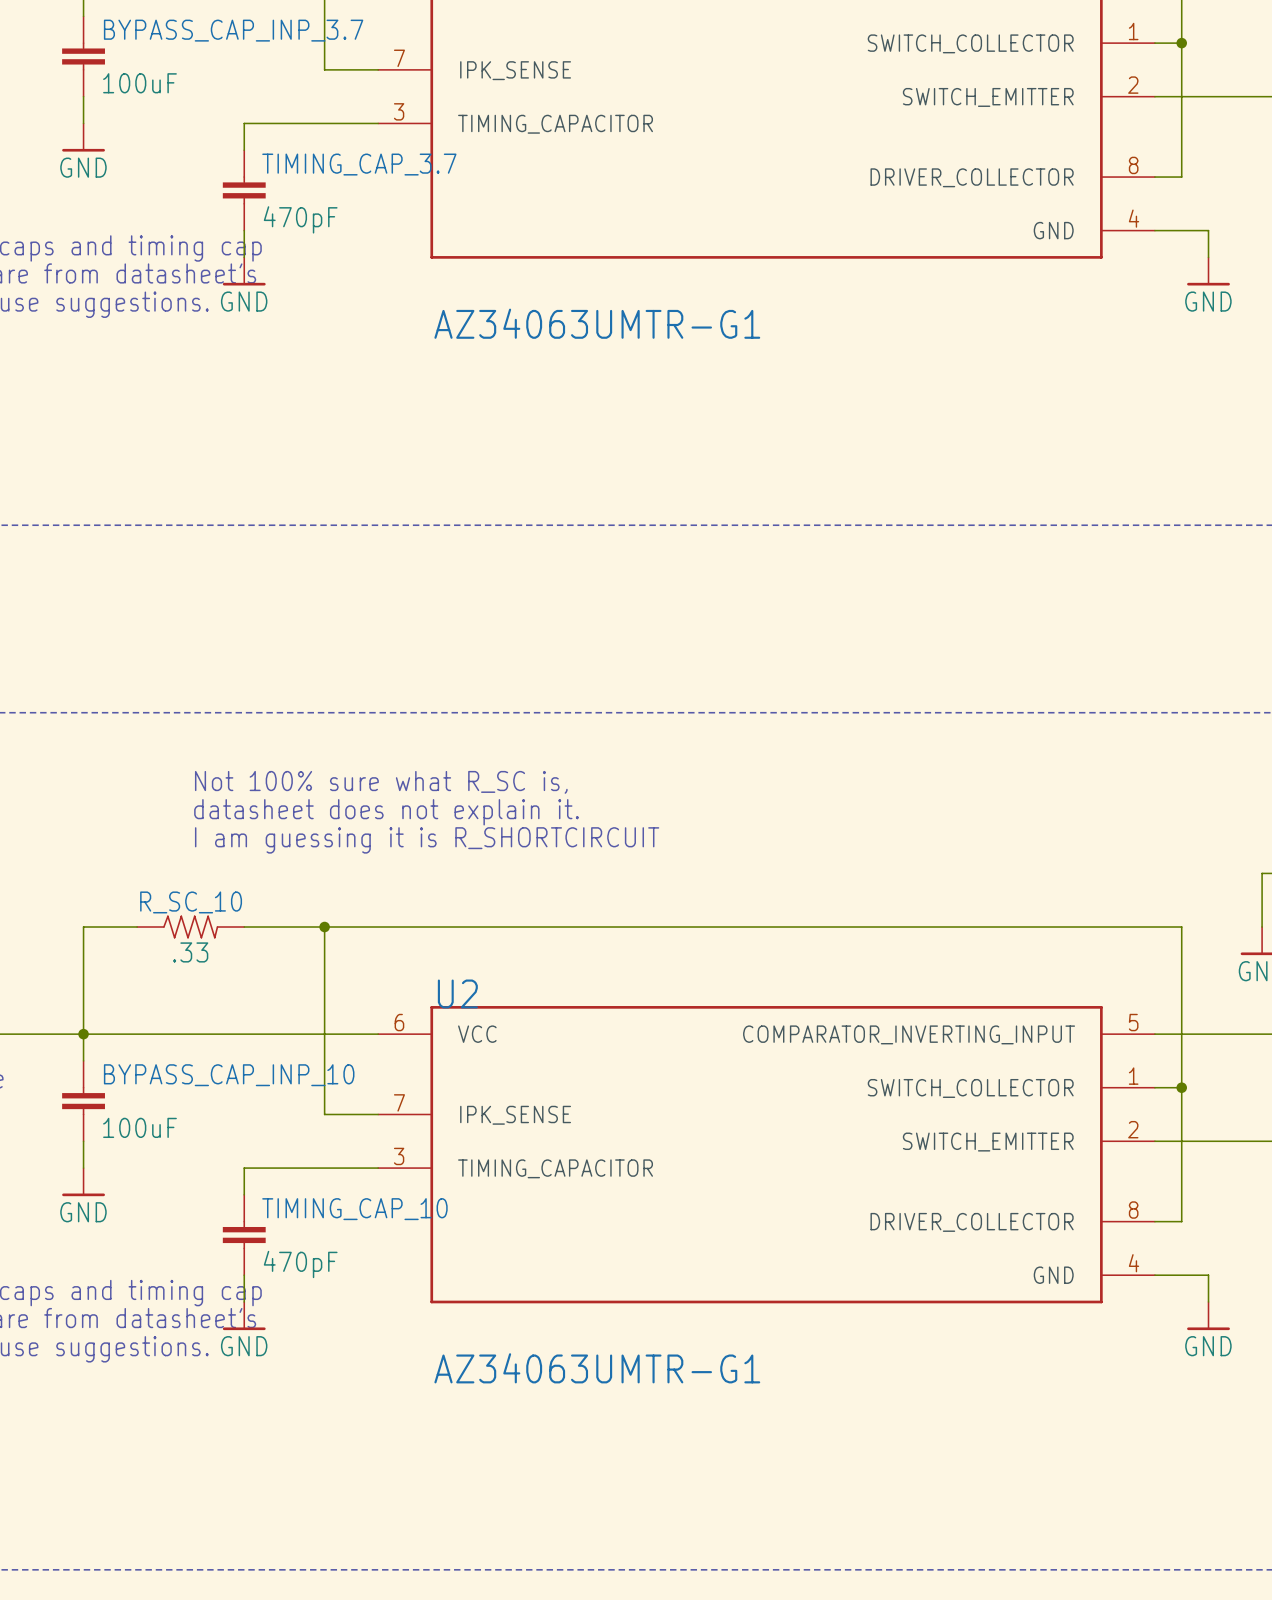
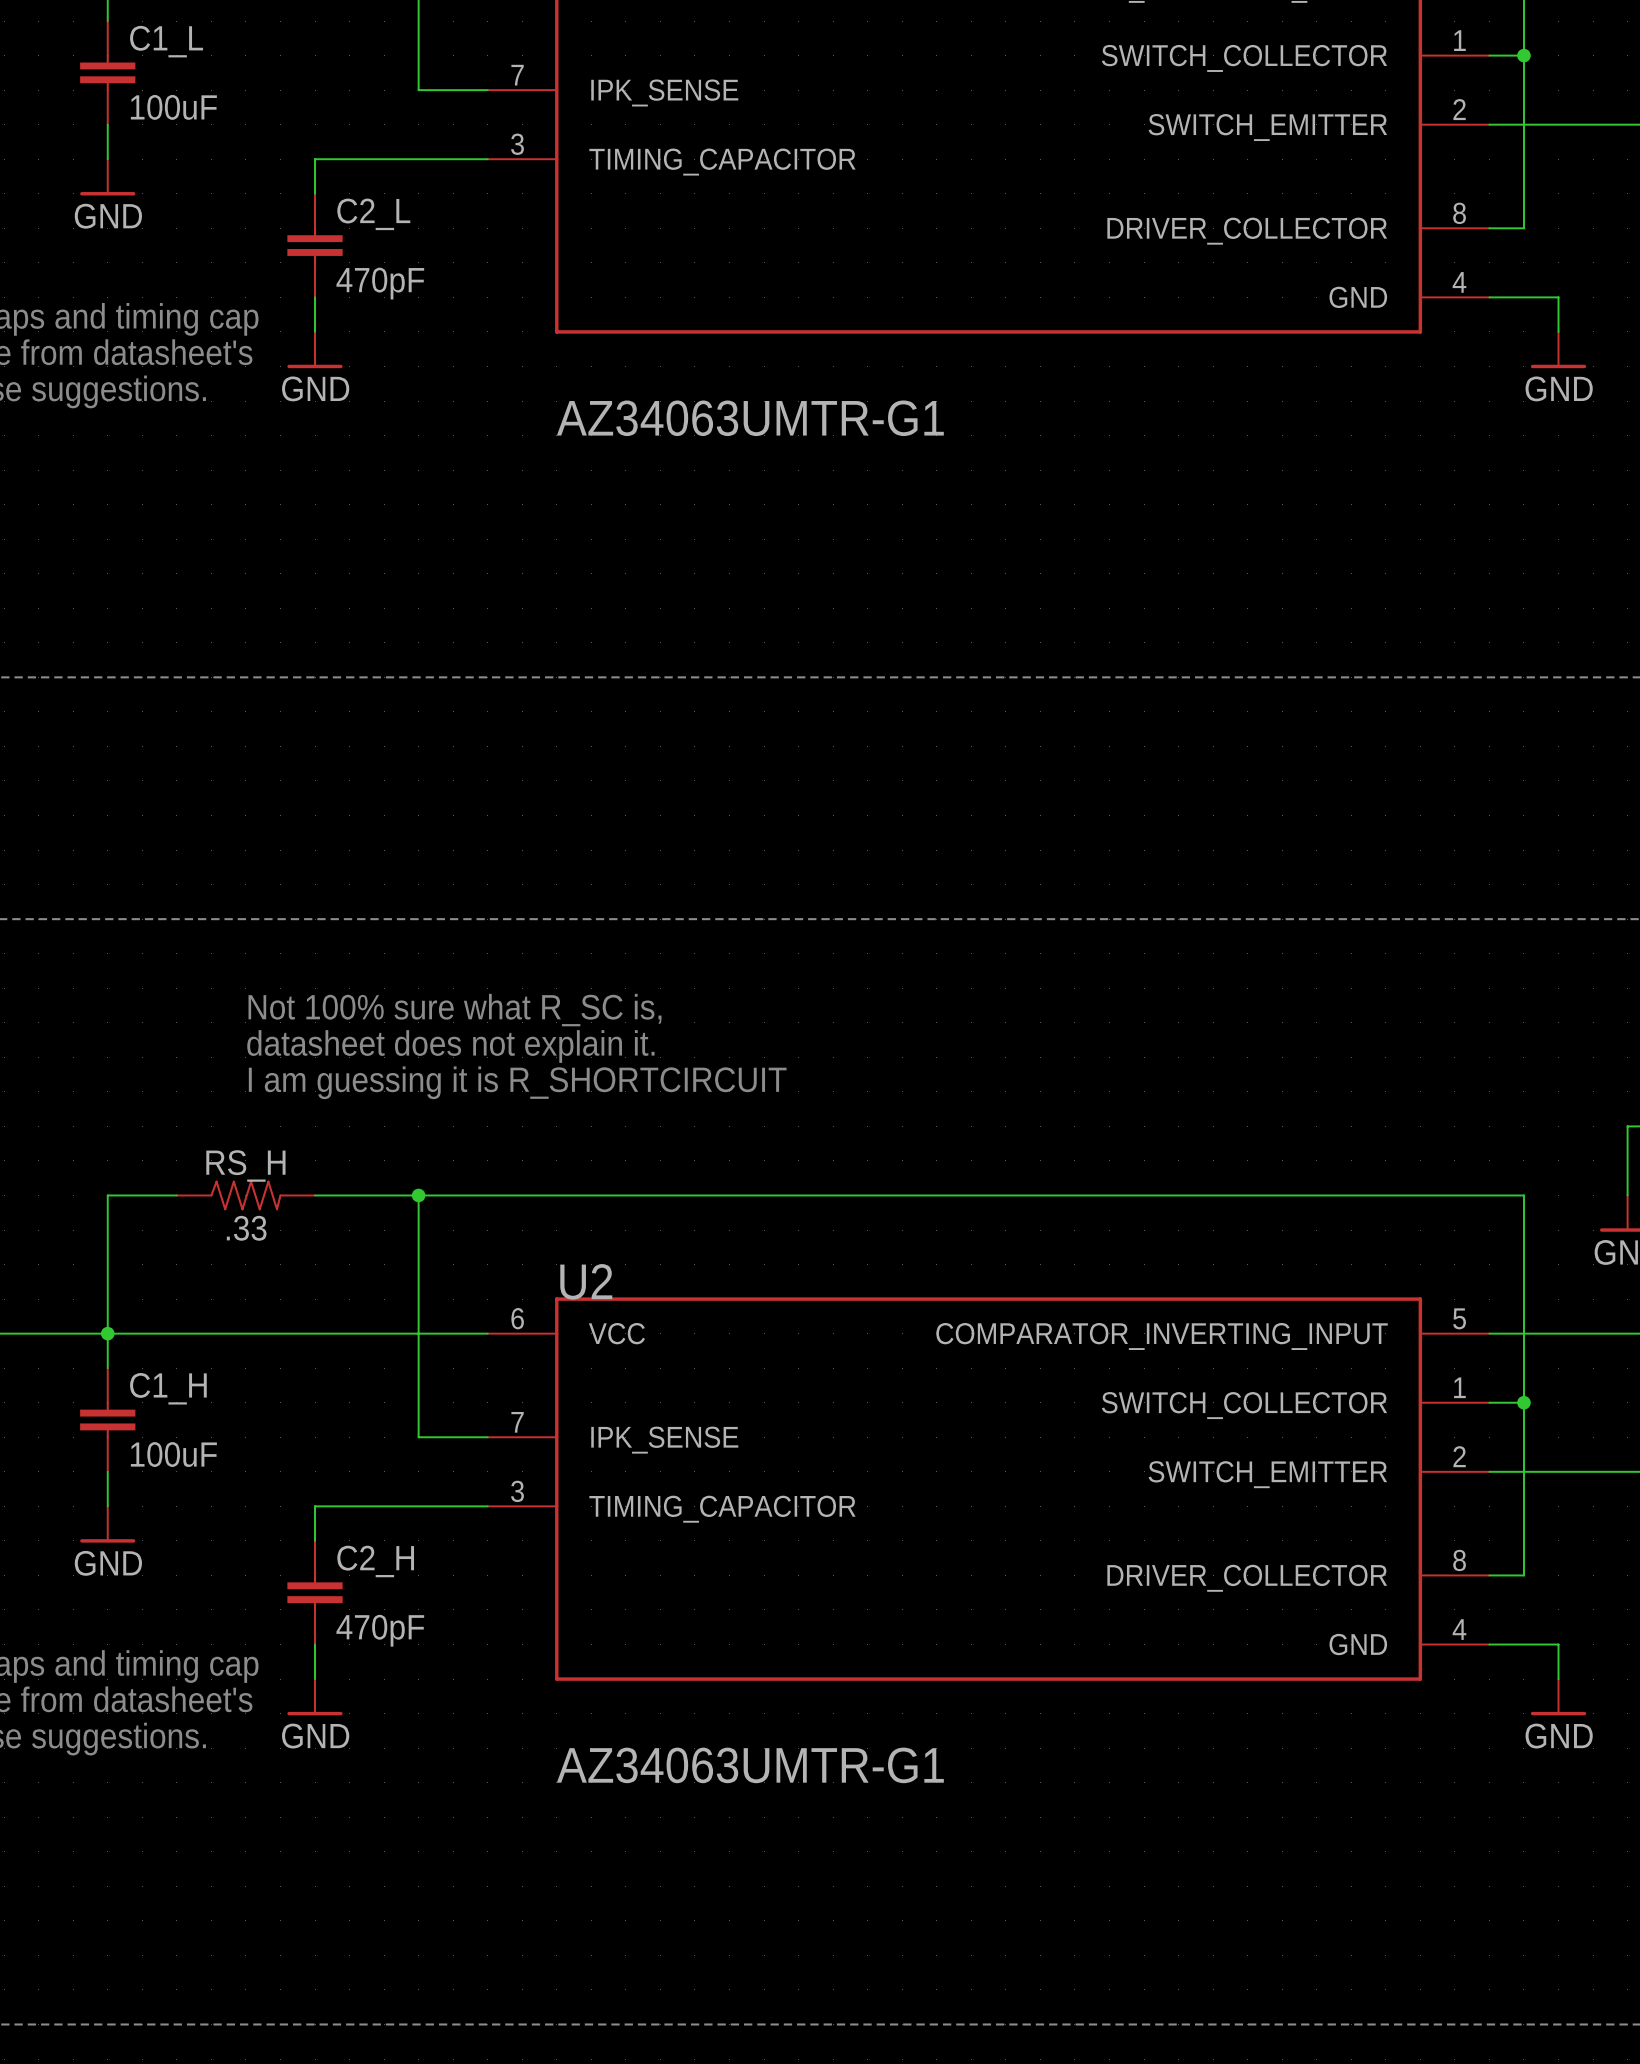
BYPASS_CAP_INP_3.7 name: BYPASS_CAP_INP_3.7 (233, 30) -> C1_L (166, 41)
TIMING_CAP_3.7 name: TIMING_CAP_3.7 (359, 164) -> C2_L (373, 214)
R_SC_10 name: R_SC_10 (191, 902) -> RS_H (245, 1165)
BYPASS_CAP_INP_10 name: BYPASS_CAP_INP_10 (229, 1075) -> C1_H (168, 1388)
TIMING_CAP_10 name: TIMING_CAP_10 (354, 1209) -> C2_H (375, 1561)

